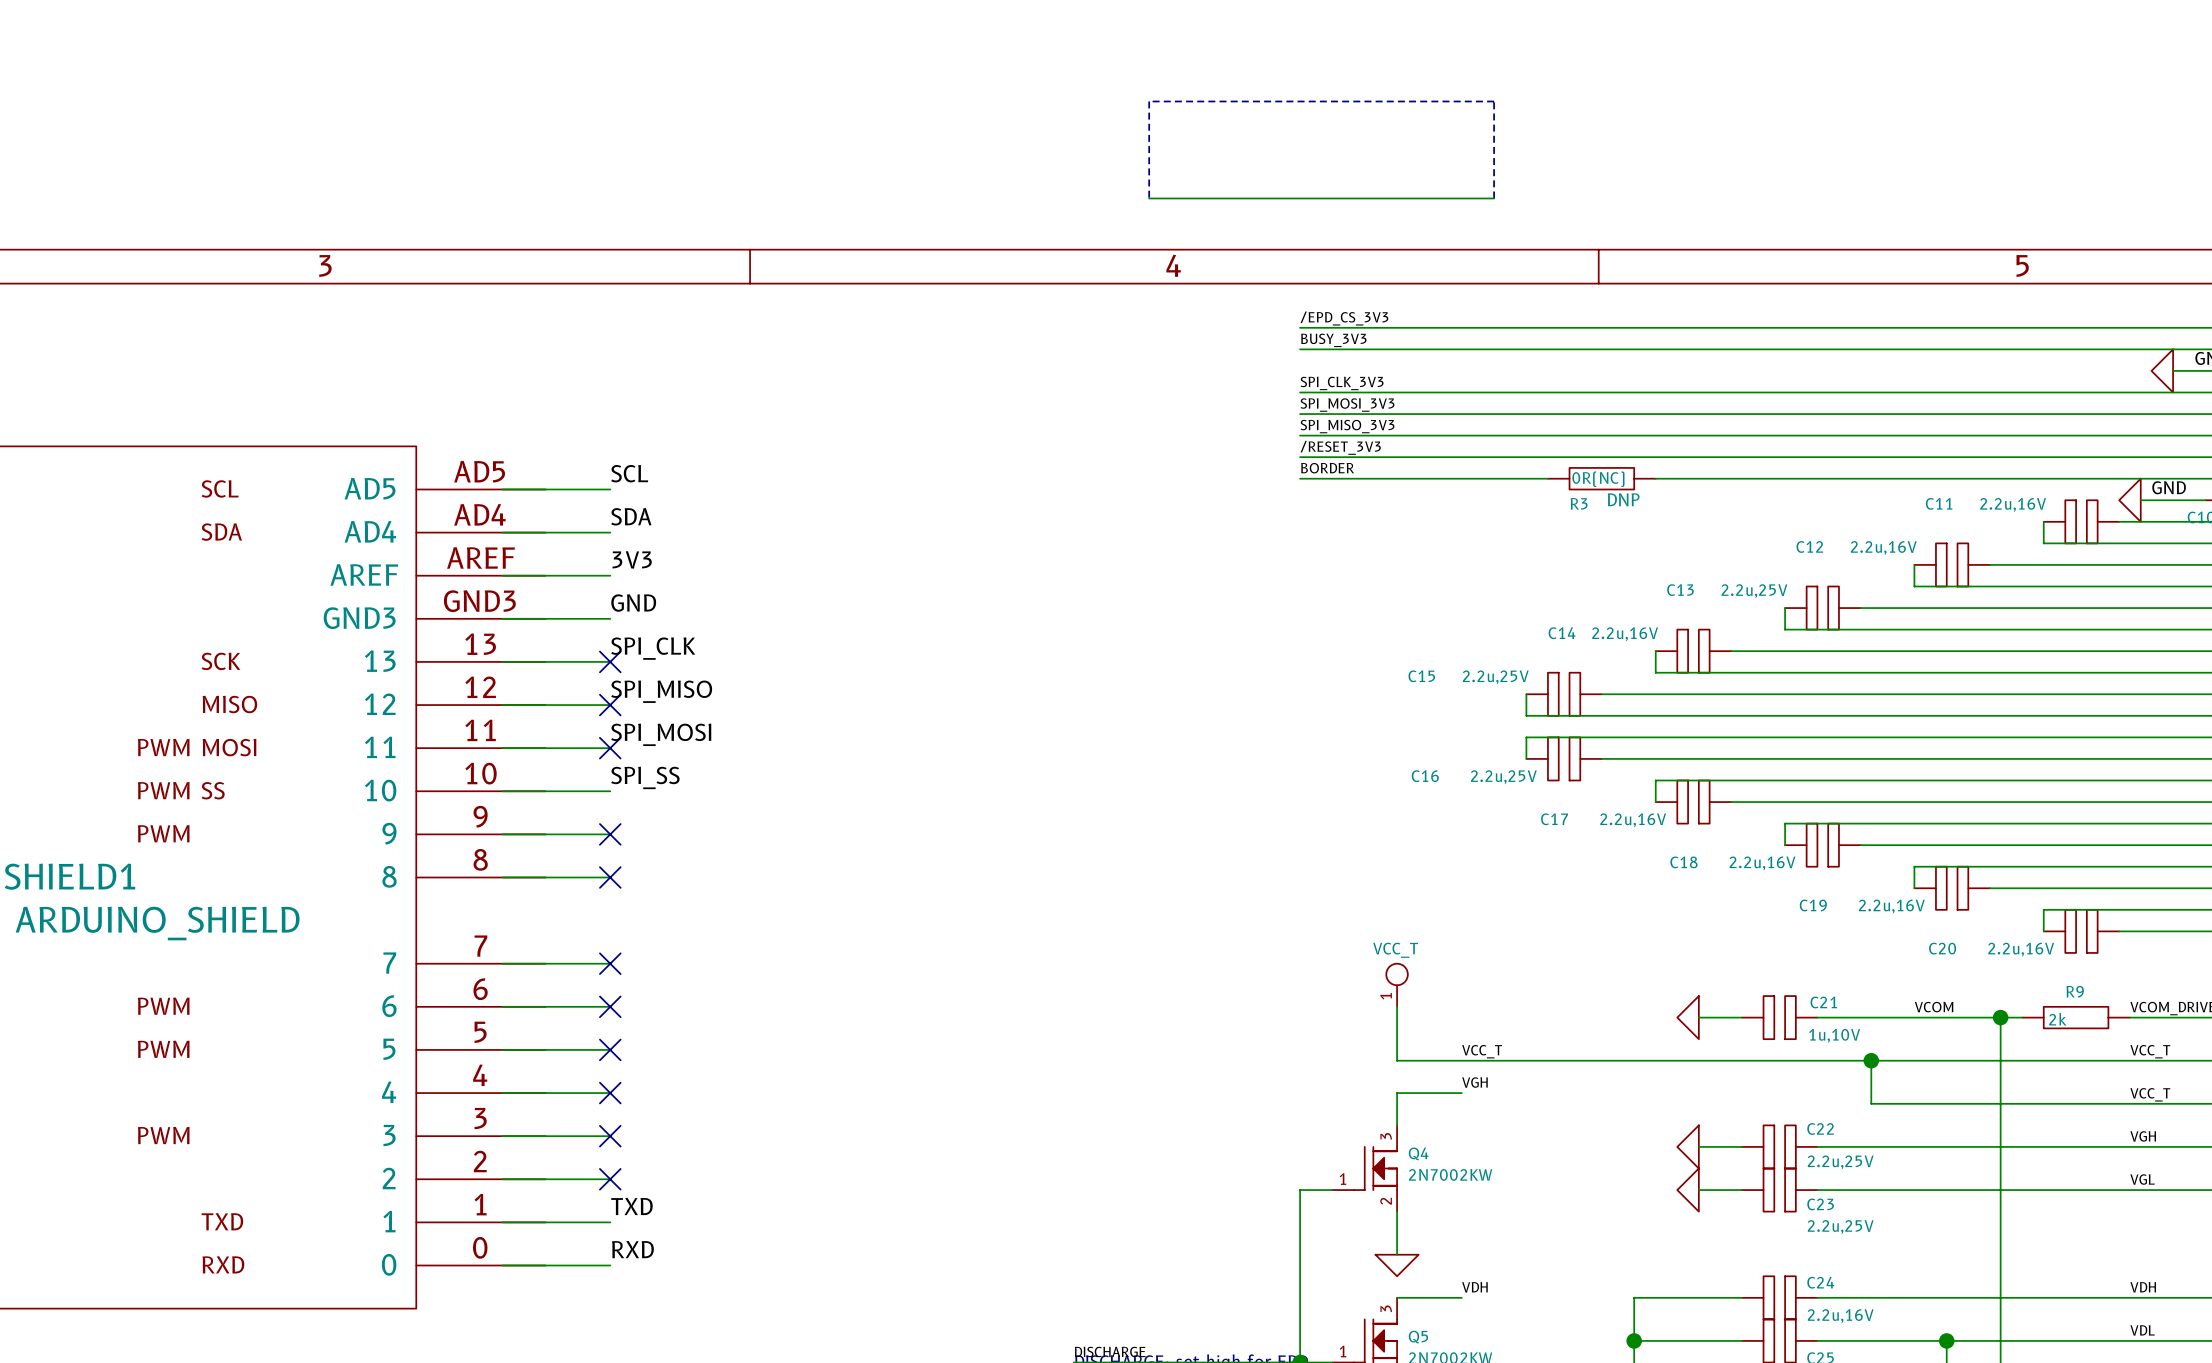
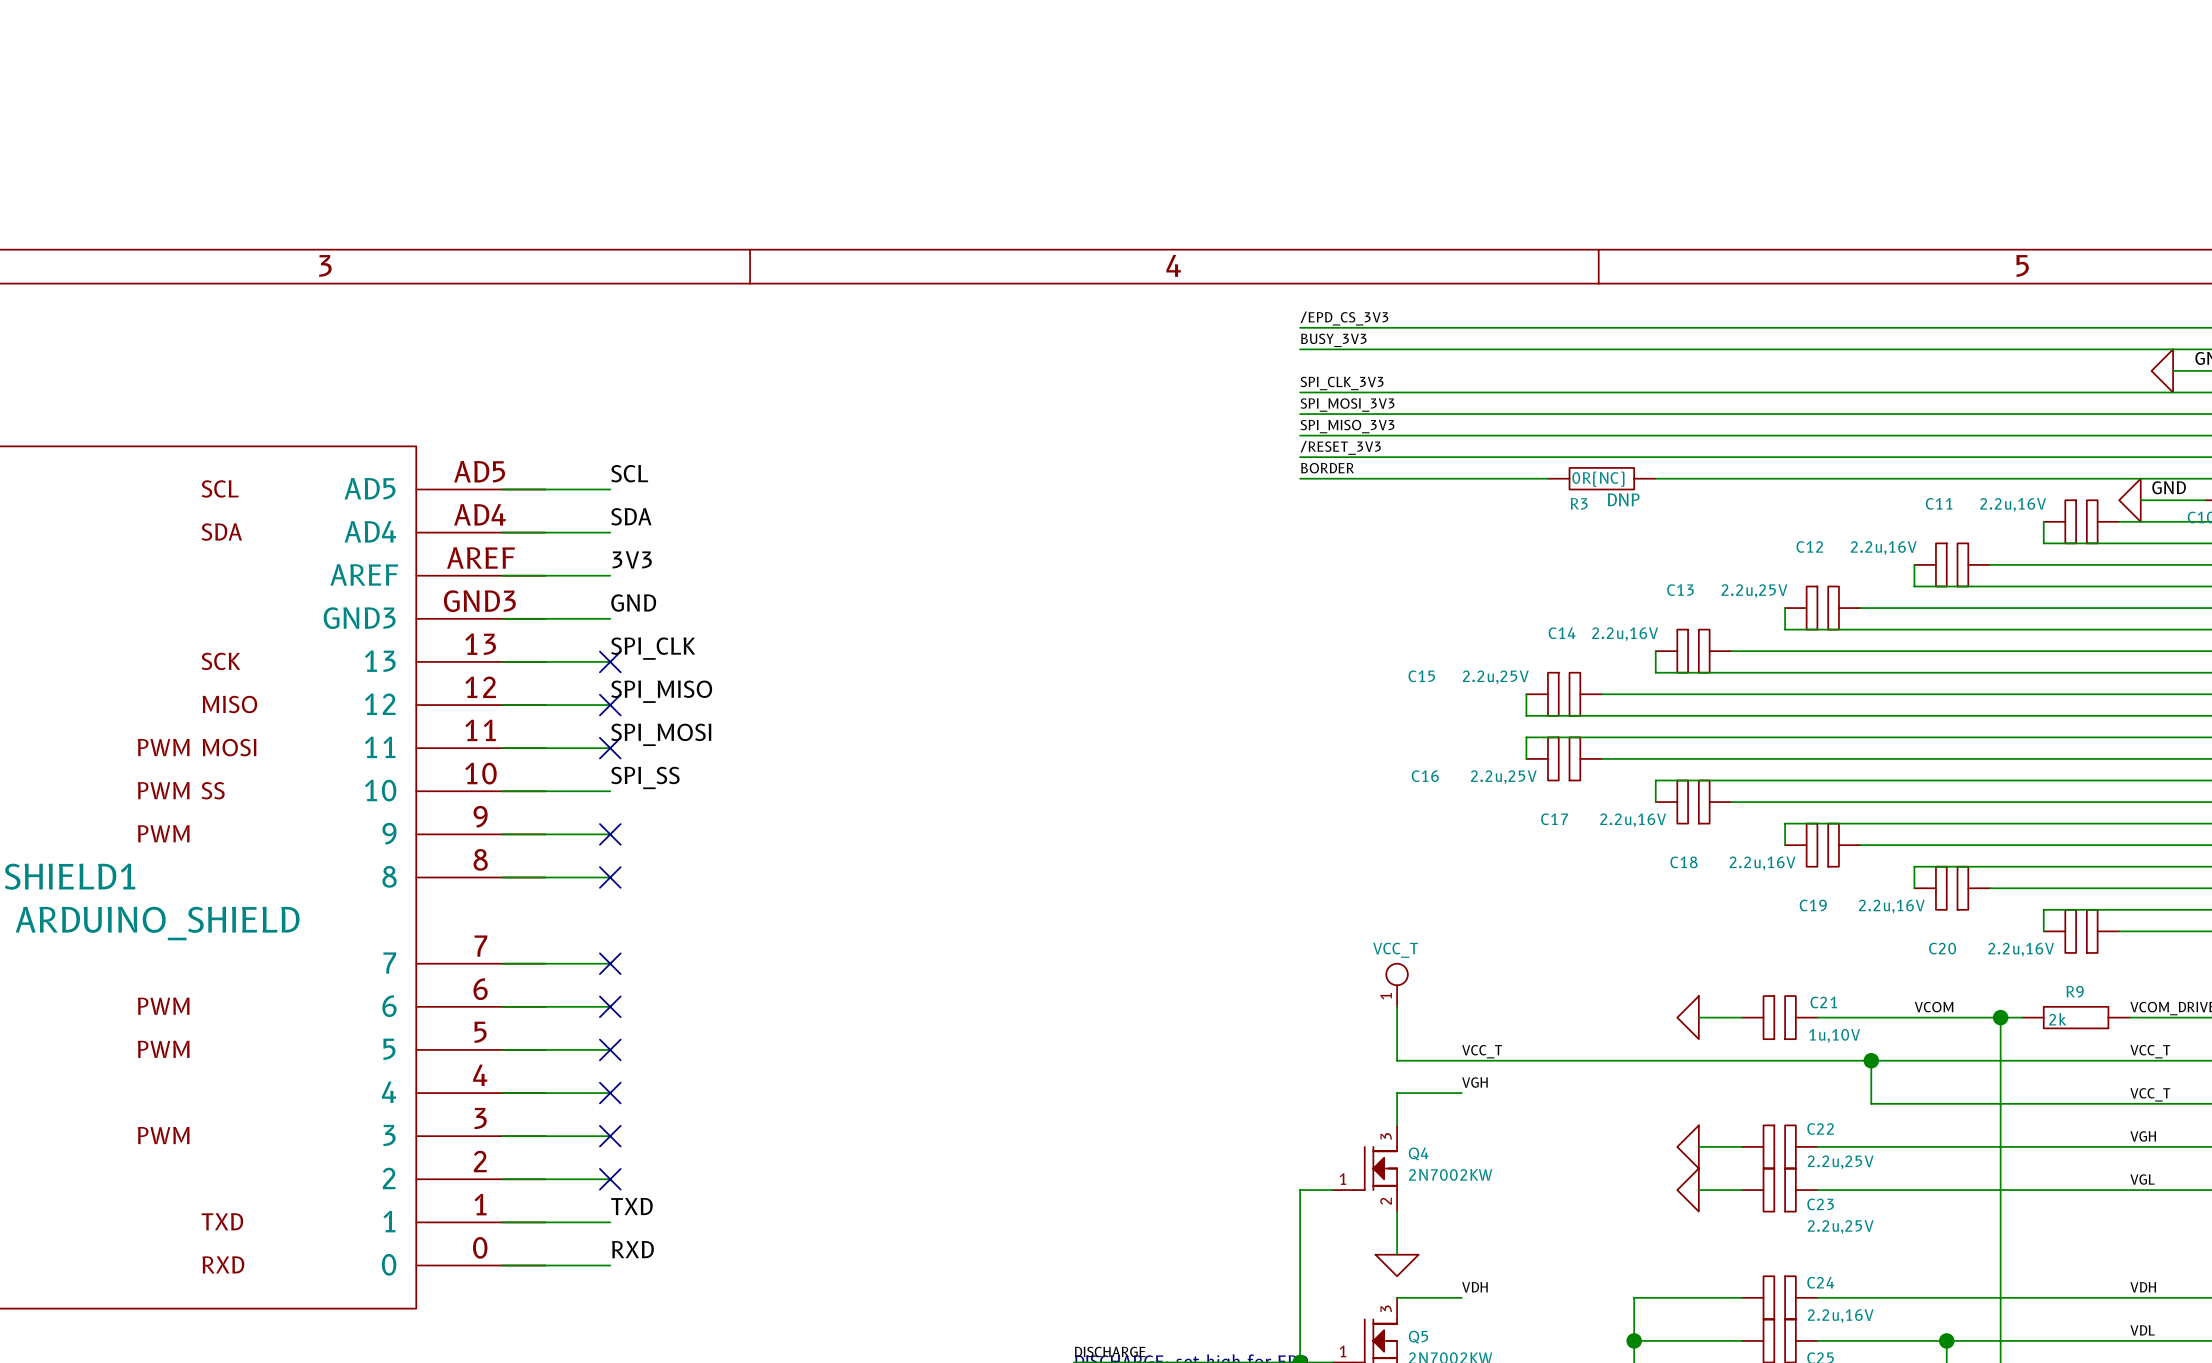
wire: (1149, 198) (1494, 198) -> none
line: (1149, 198) (1149, 101) (1494, 101) (1494, 198) -> none

